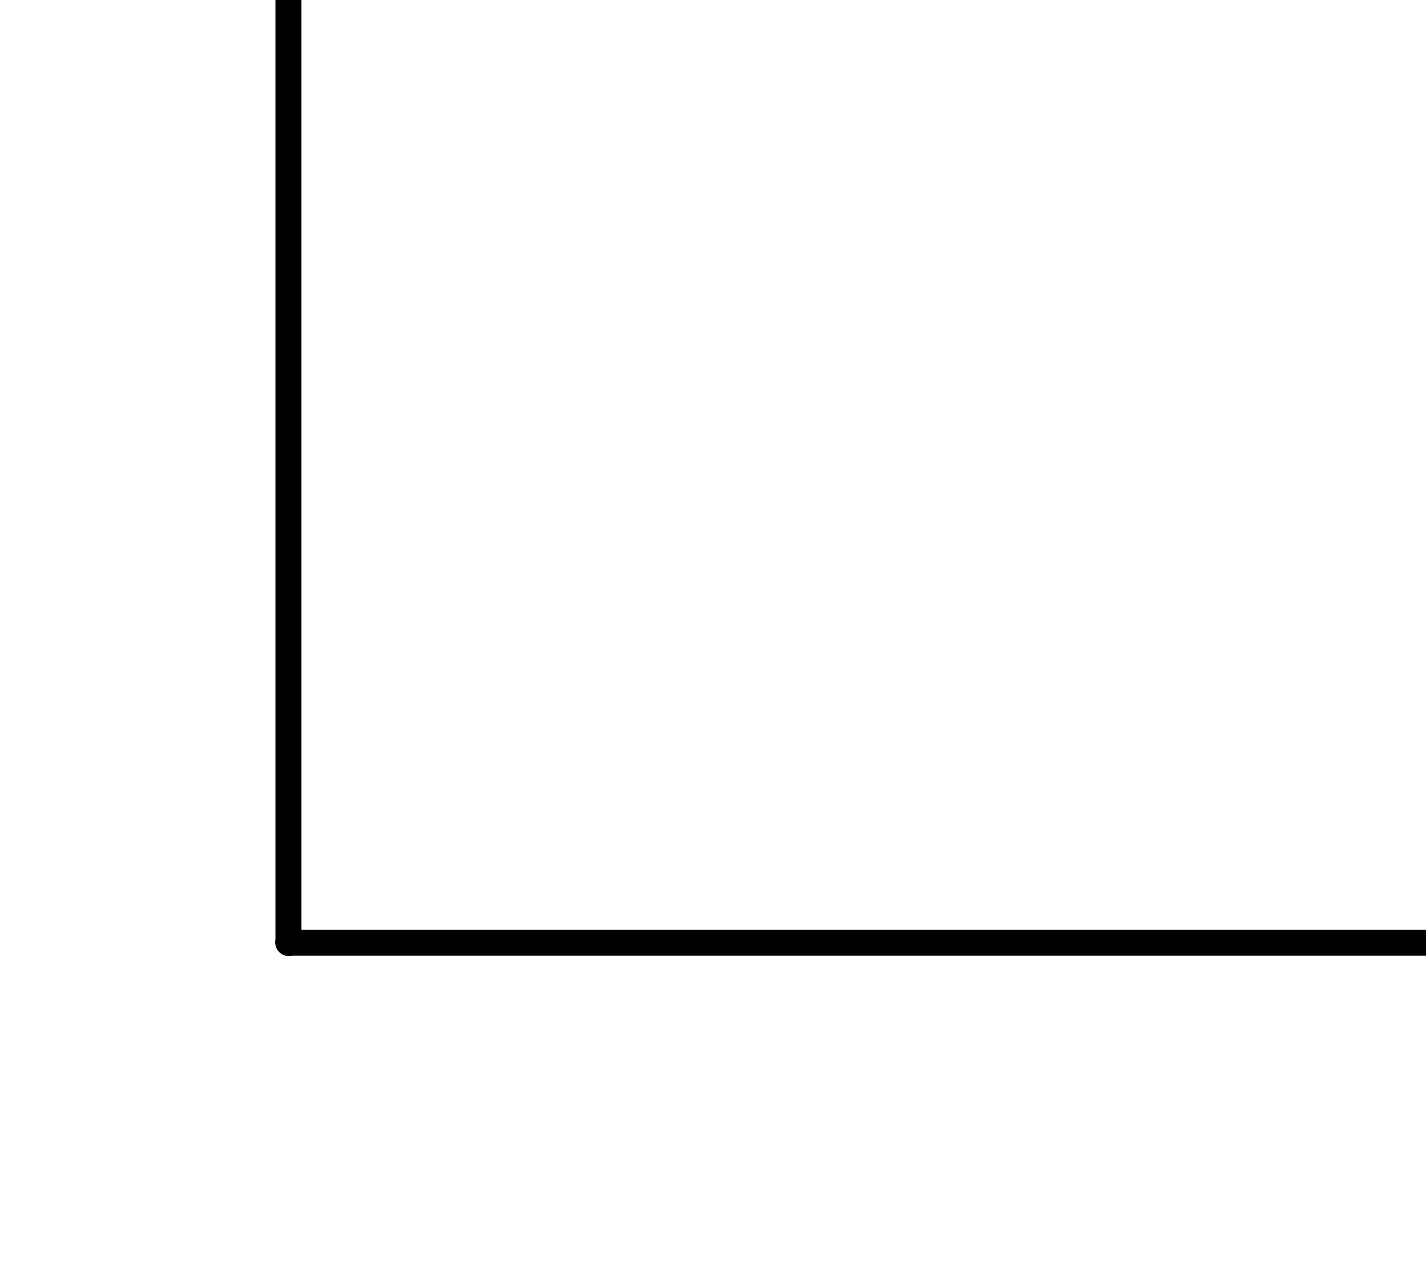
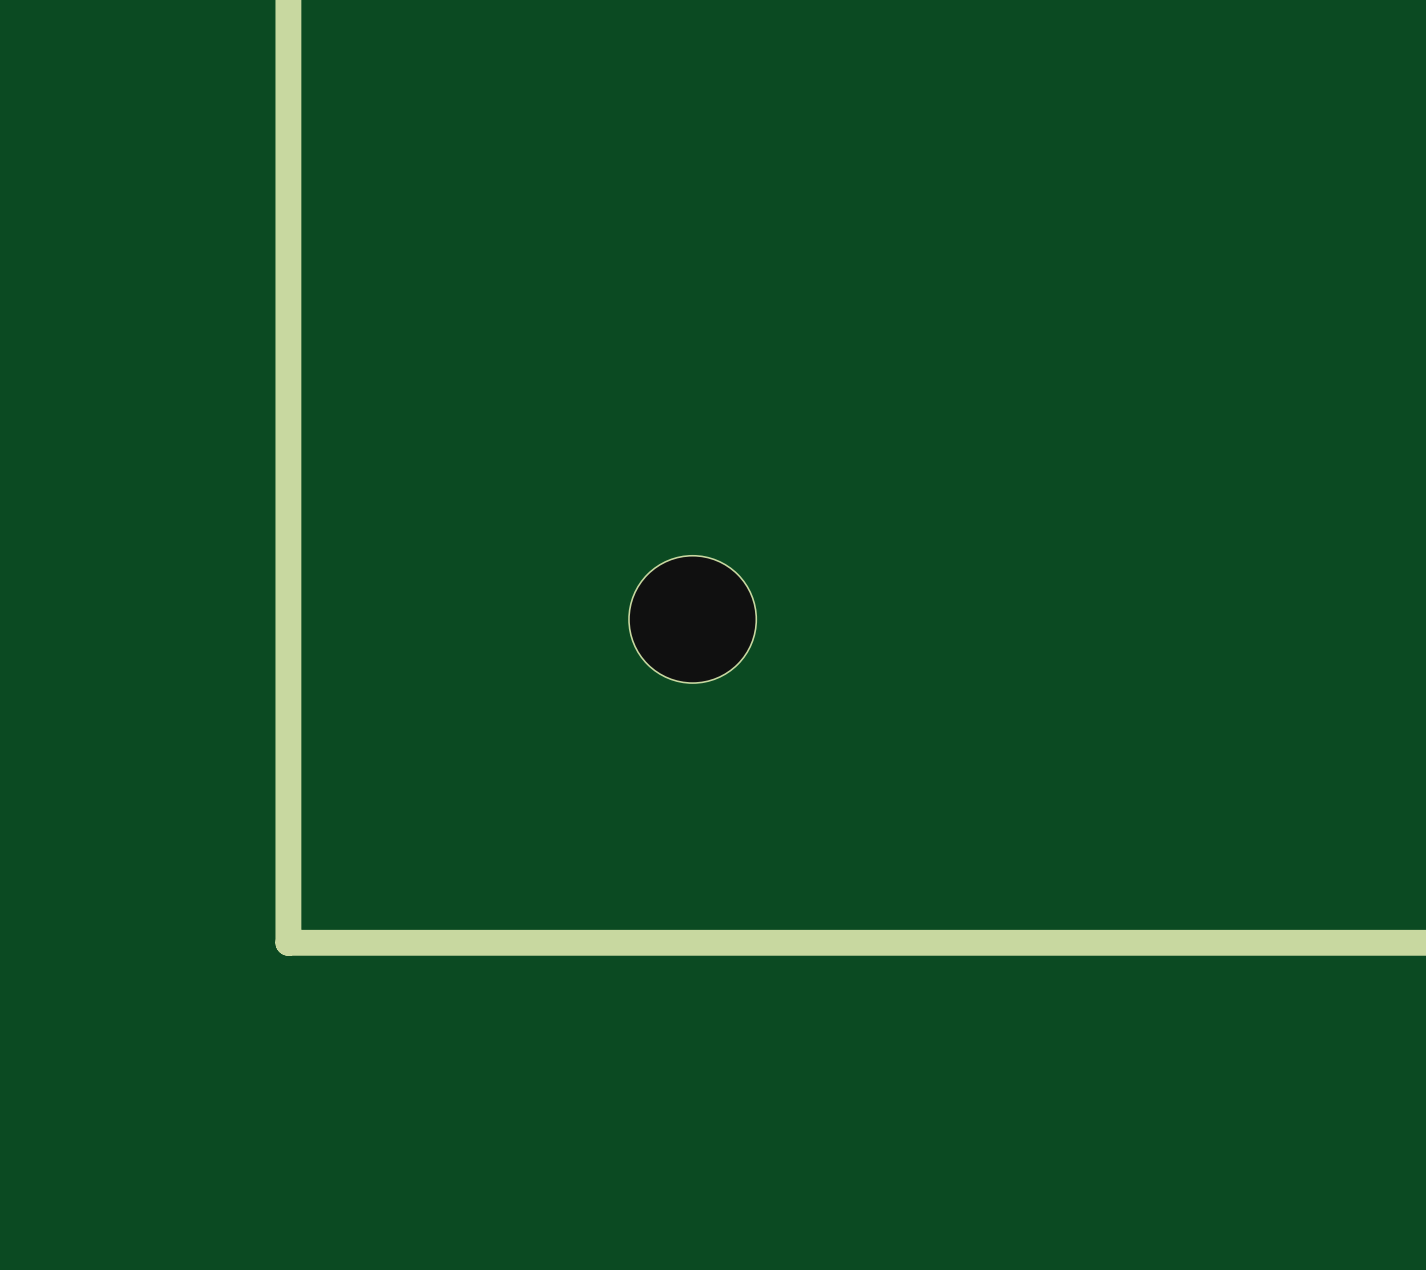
hole: none -> (692, 619)

